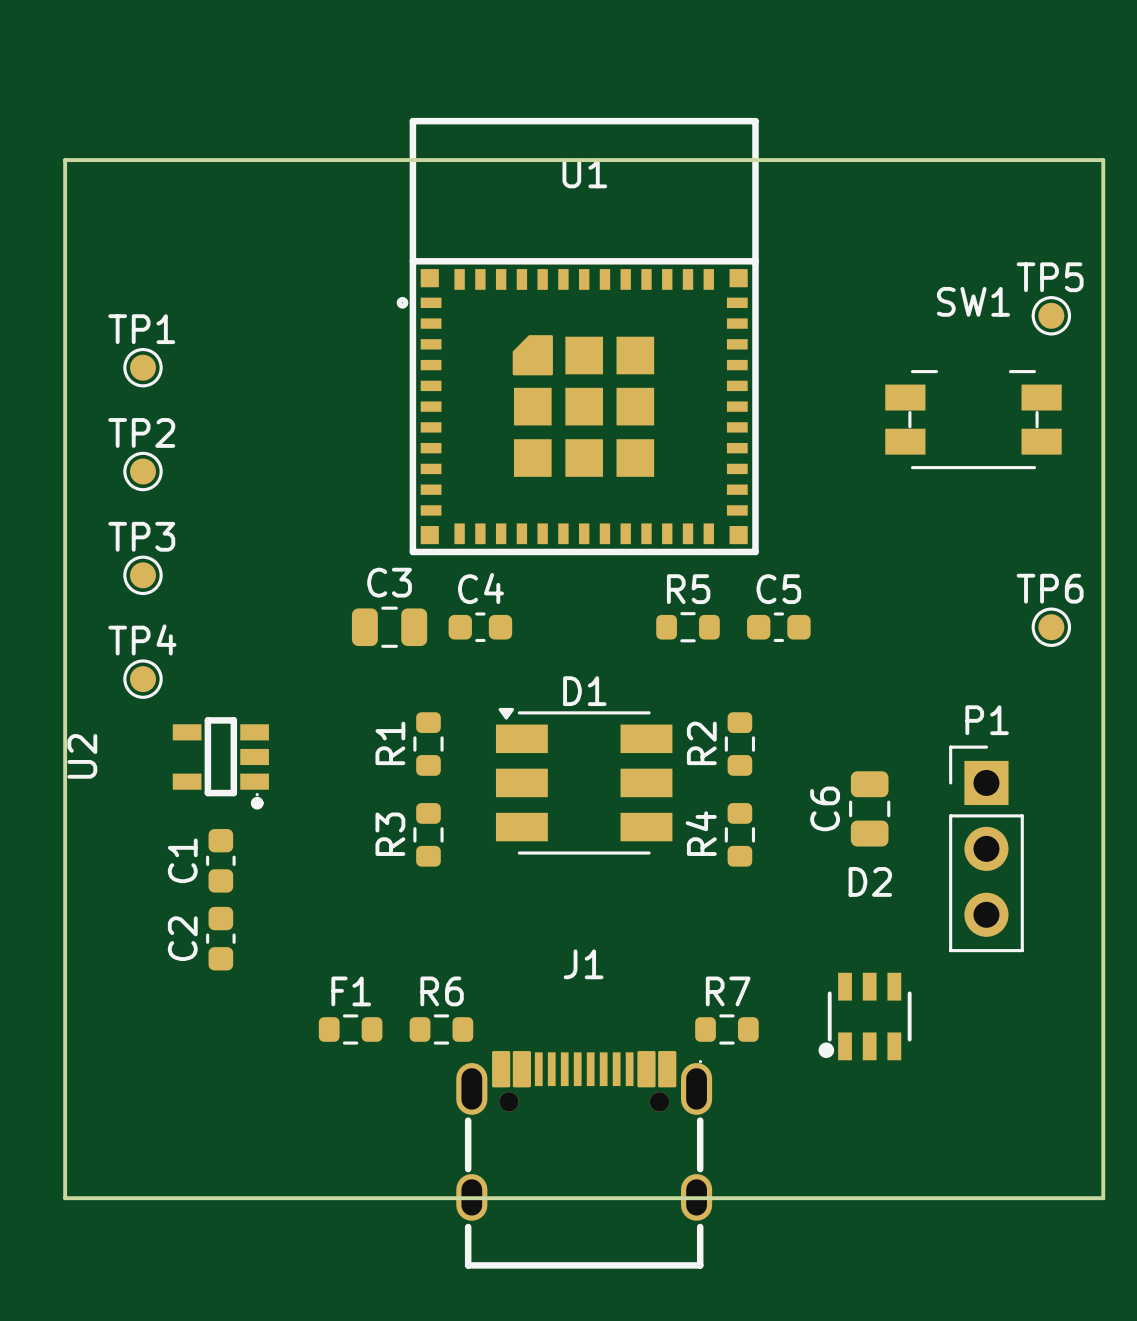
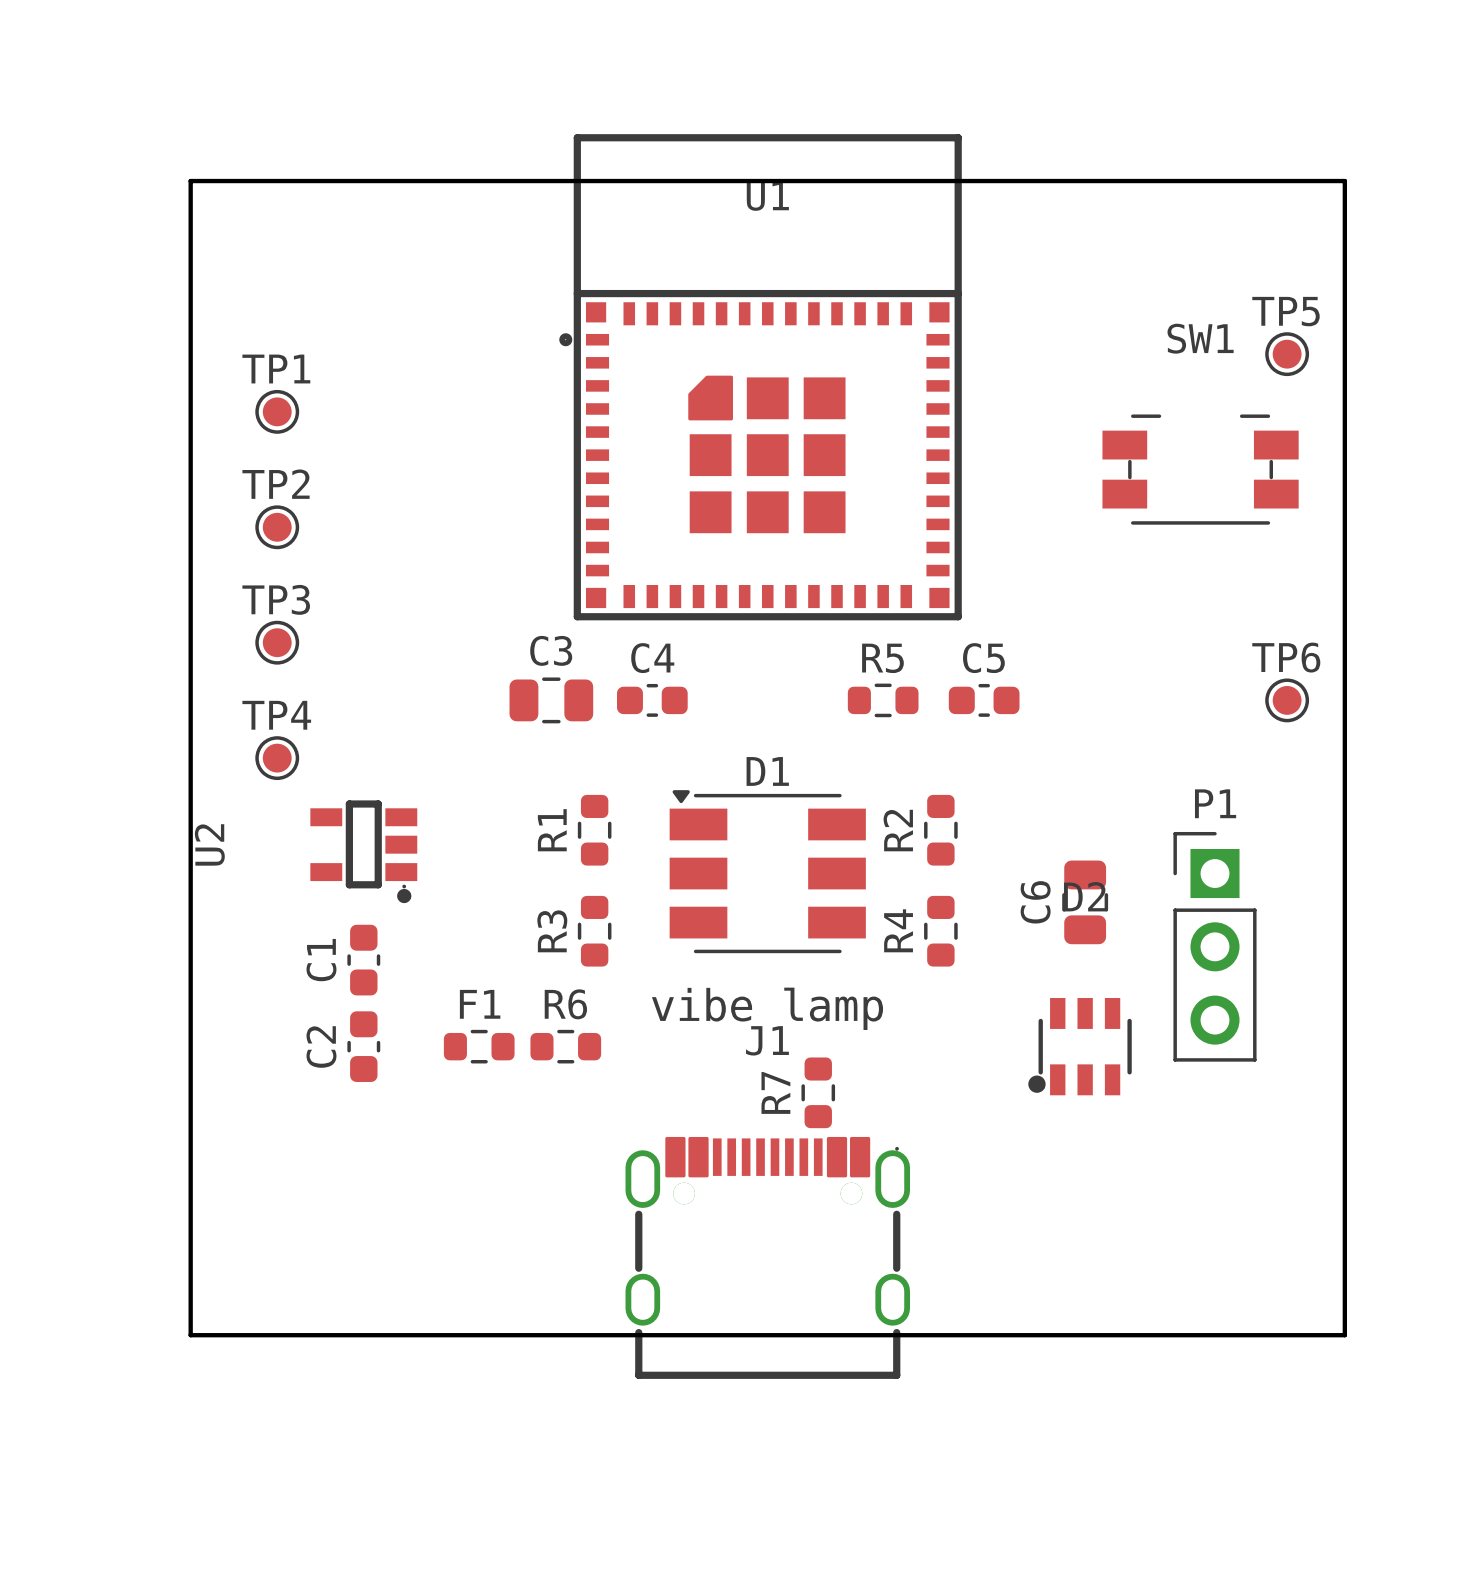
text: none -> vibe lamp (767, 1008)
R7 name position: R7 (728, 991) -> R7 (775, 1092)
D2 position: (865, 1016) -> (1080, 1046)
F1 position: (350, 1029) -> (479, 1046)
R6 position: (441, 1029) -> (565, 1046)
R7 rotation: 0° (726, 1029) -> 90° clockwise (818, 1092)
R7 position: (726, 1029) -> (818, 1092)
J1 position: (584, 1159) -> (767, 1257)

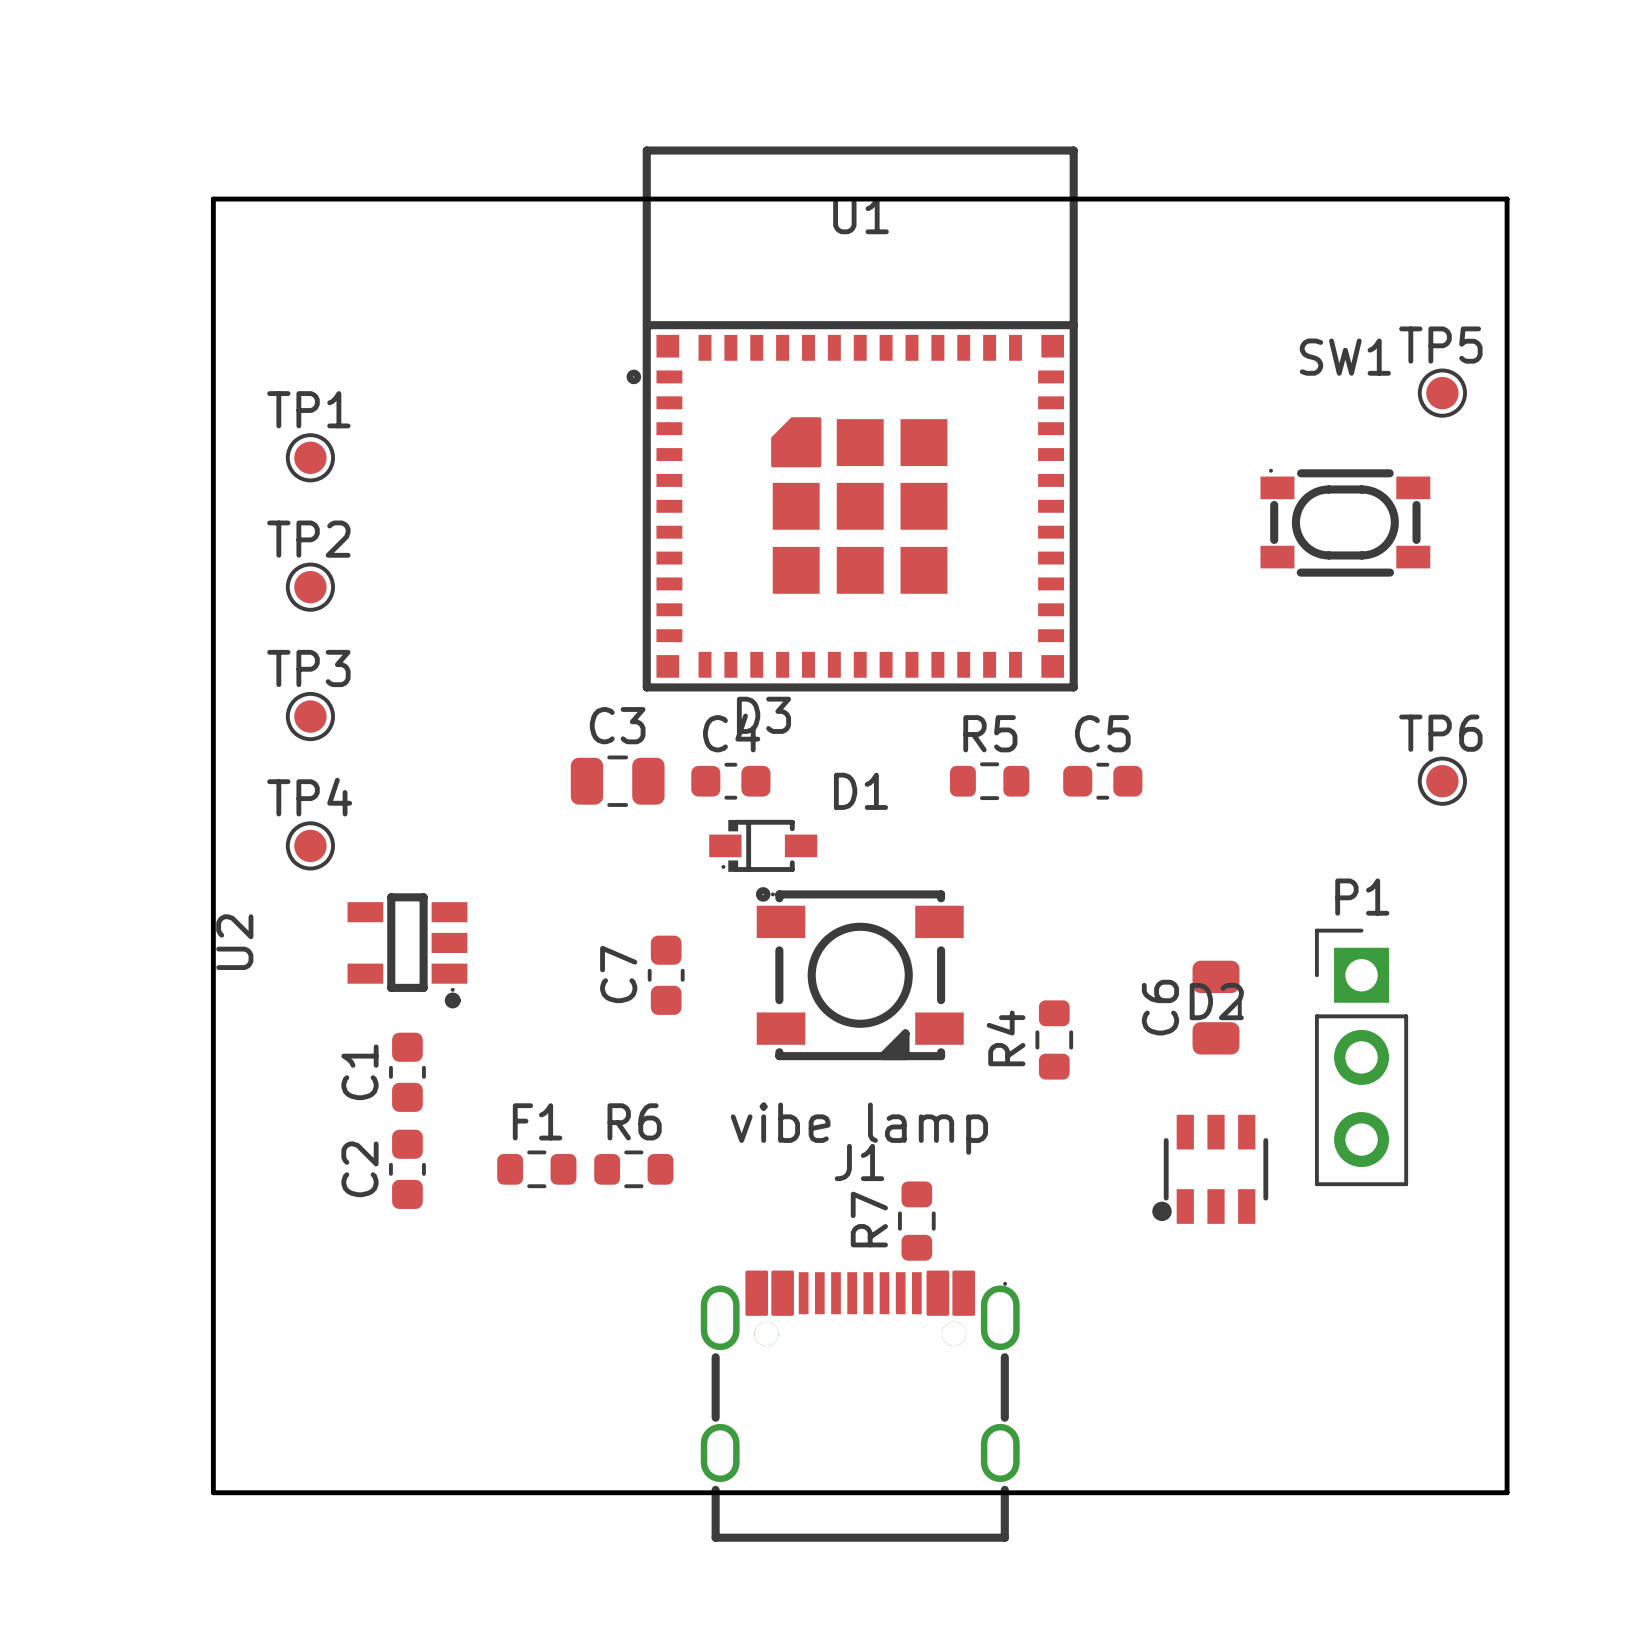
SW1 footprint: [1102, 414, 1299, 525] -> [1260, 468, 1431, 577]
D3: none -> (763, 845)
D1 name position: D1 (767, 771) -> D1 (861, 791)
D1 footprint: [669, 790, 866, 954] -> [755, 887, 964, 1061]
R1: (594, 830) -> none
R2: (940, 830) -> none
C7: none -> (666, 975)
R3: (594, 931) -> none

